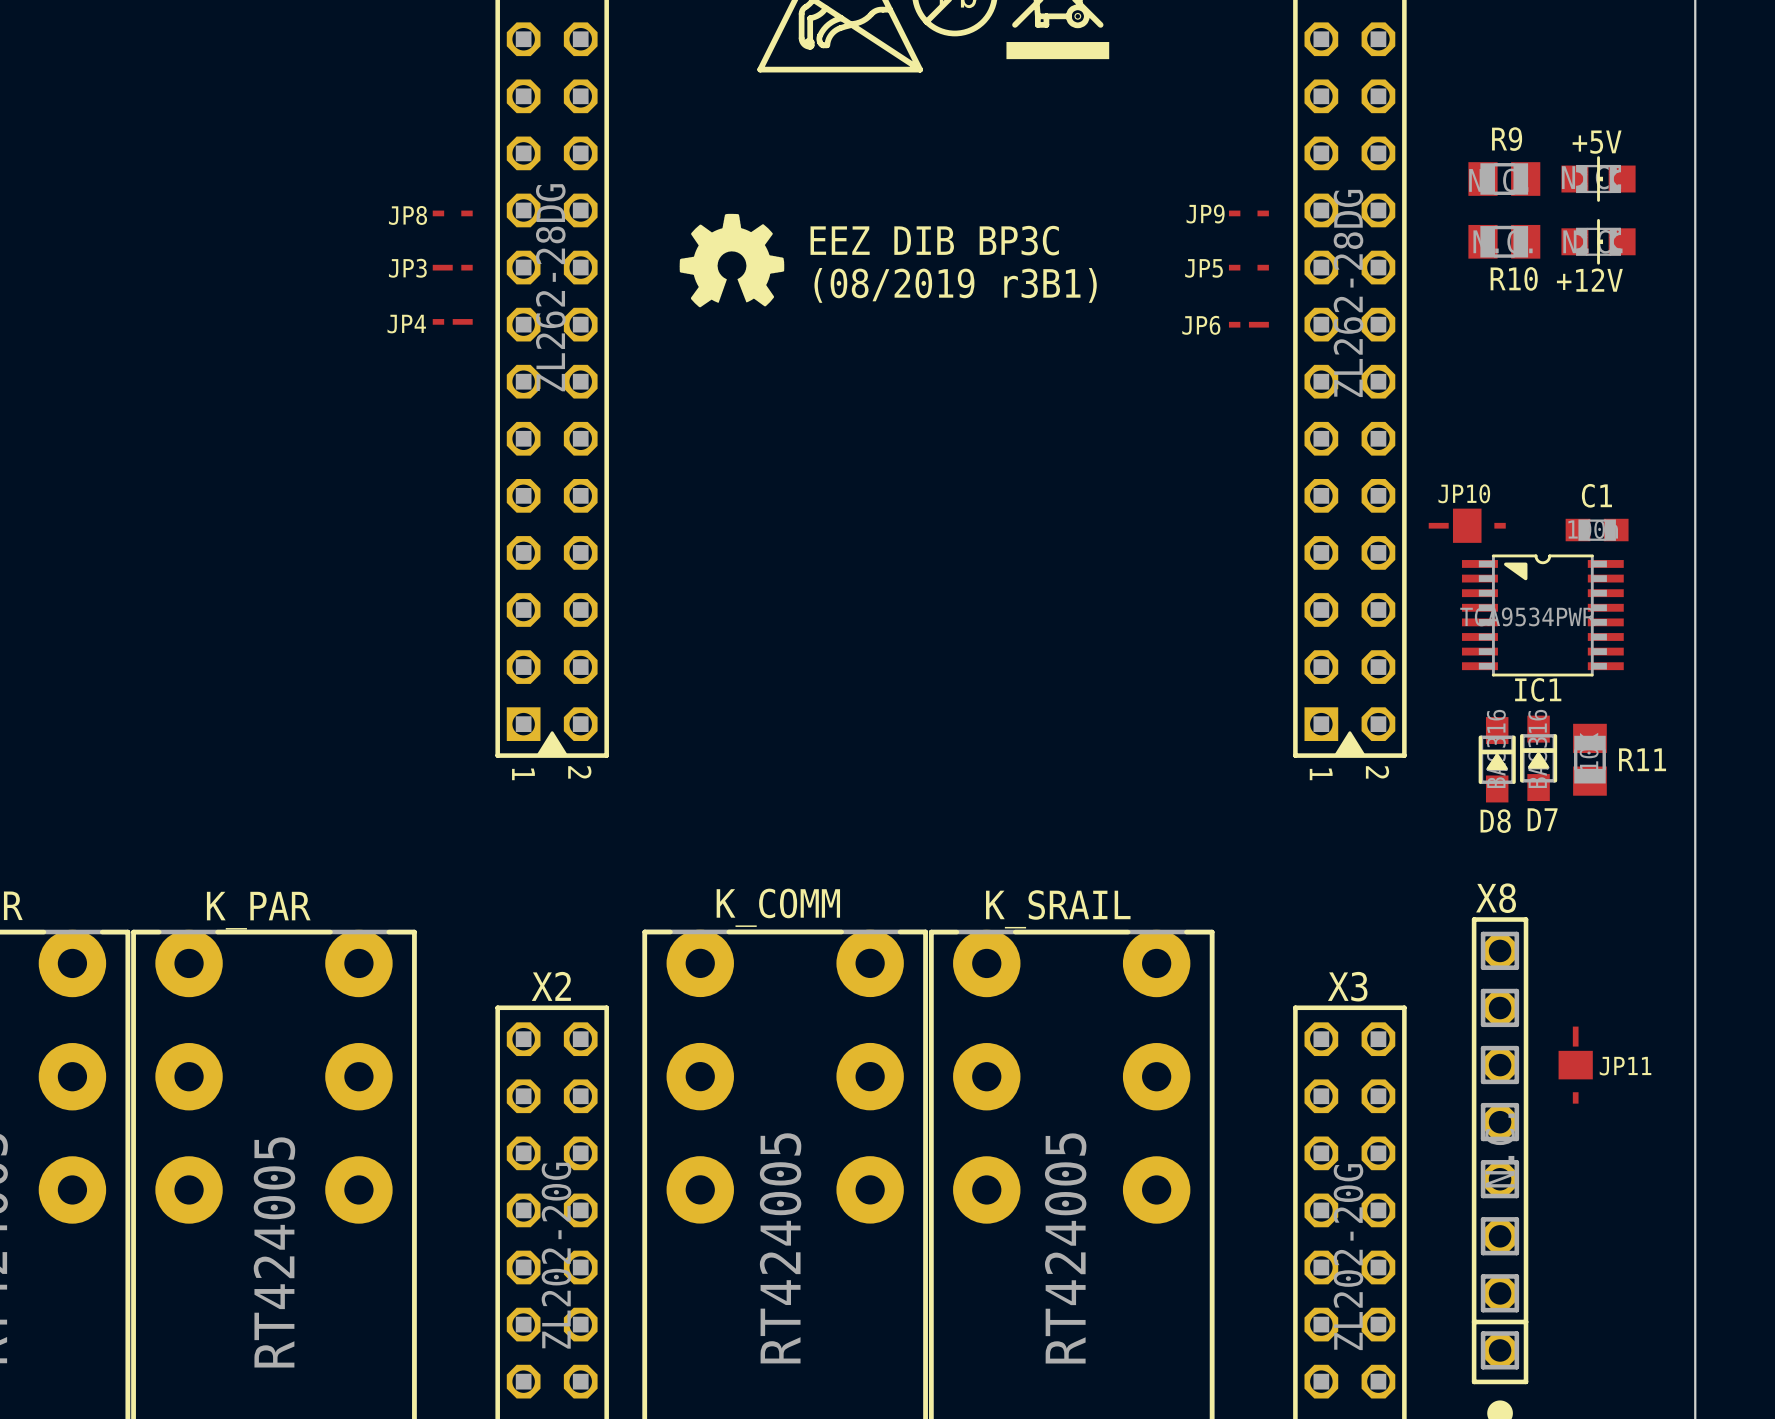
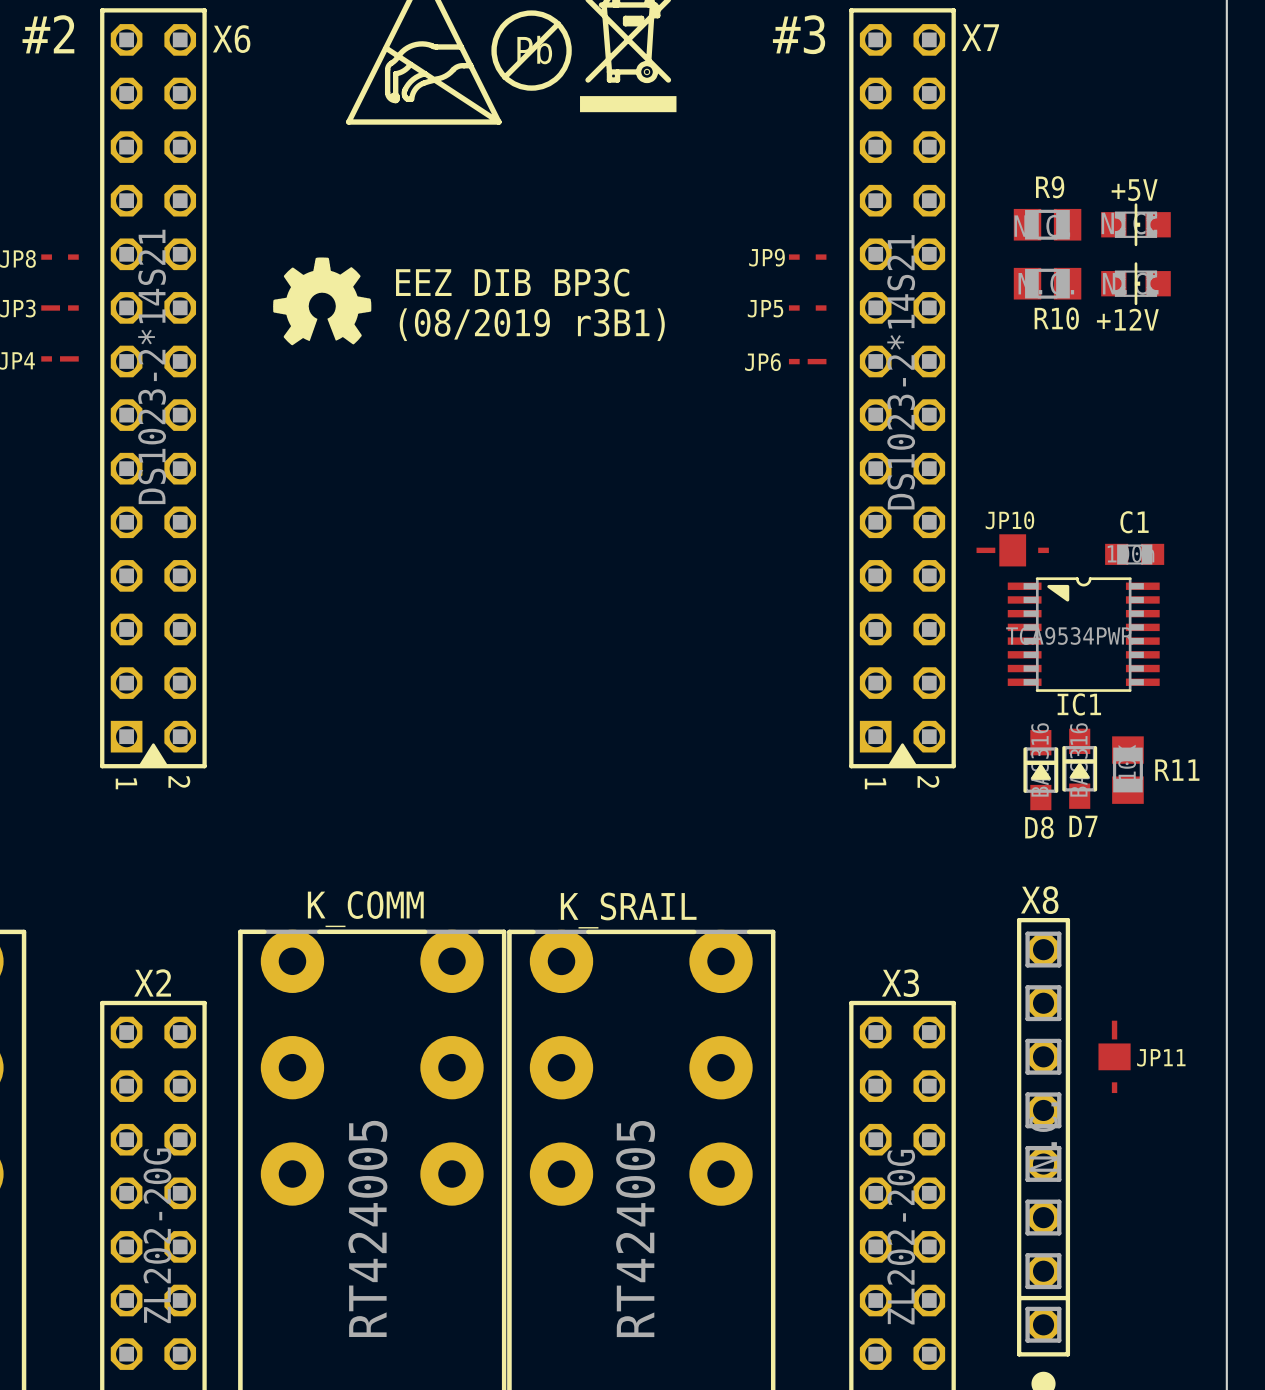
X6 value: ZL262-28DG (550, 287) -> DS1023-2*14S21 (152, 366)
X7 value: ZL262-28DG (1348, 293) -> DS1023-2*14S21 (901, 372)

